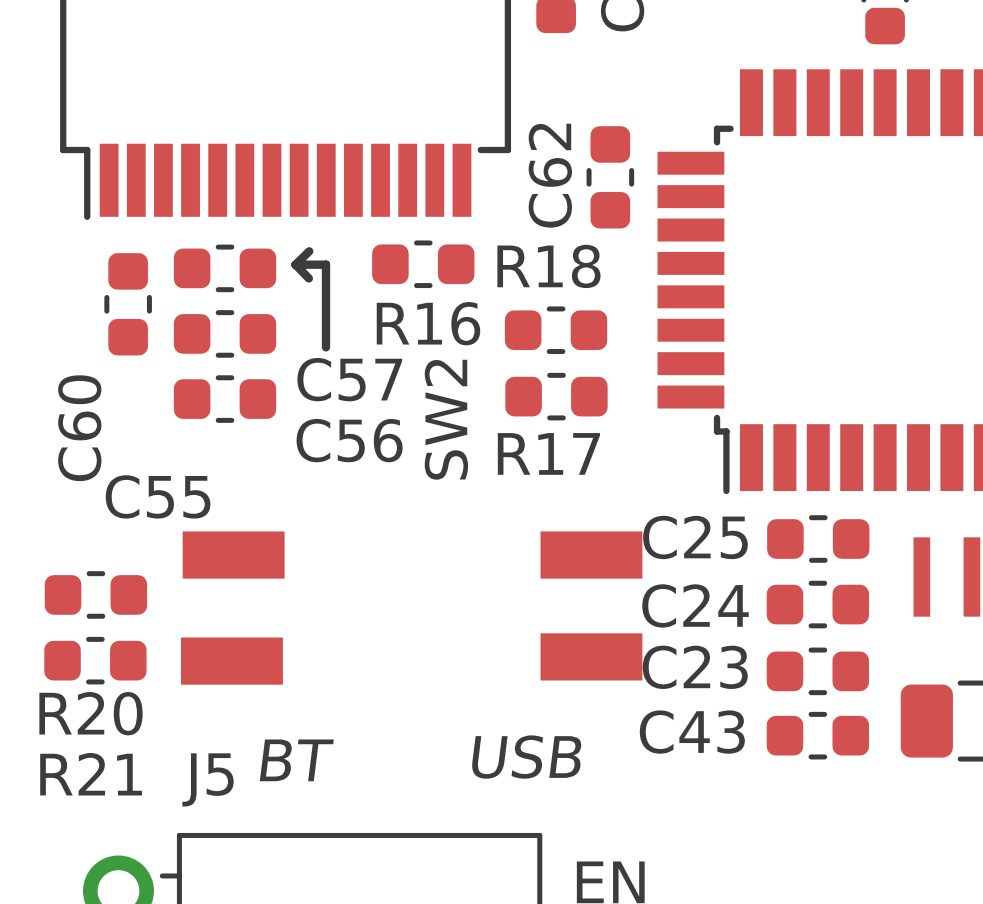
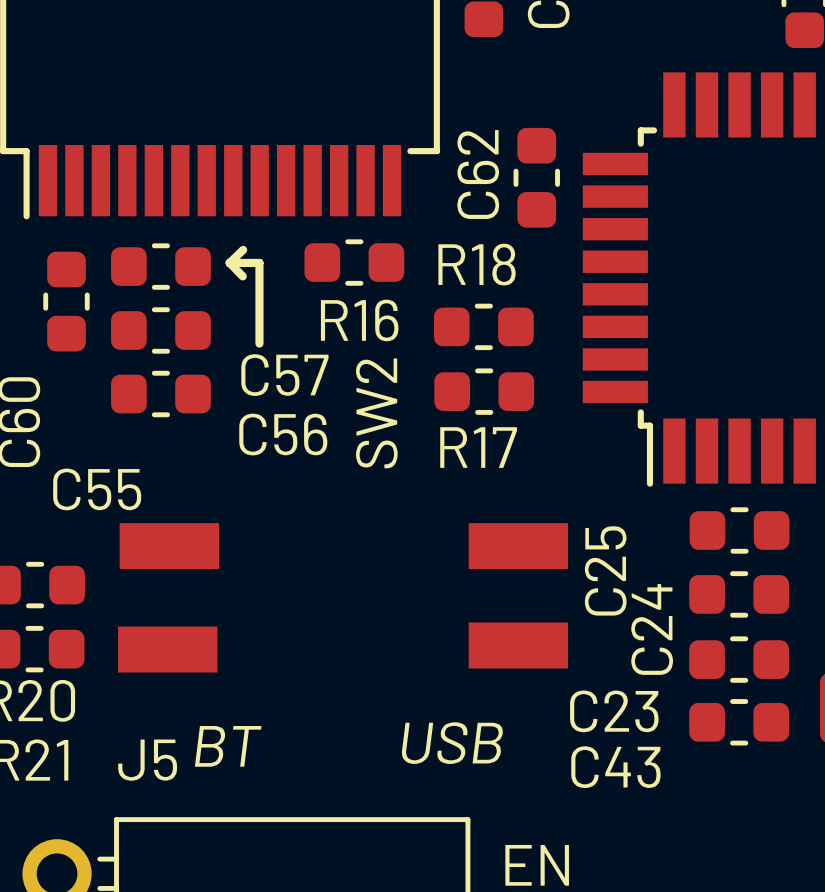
C25 name rotation: 0° (695, 537) -> 90° counterclockwise (605, 570)
C24 name rotation: 0° (695, 605) -> 90° counterclockwise (652, 629)
C23 name position: C23 (695, 667) -> C23 (614, 711)
C43 name position: C43 (692, 732) -> C43 (615, 767)

